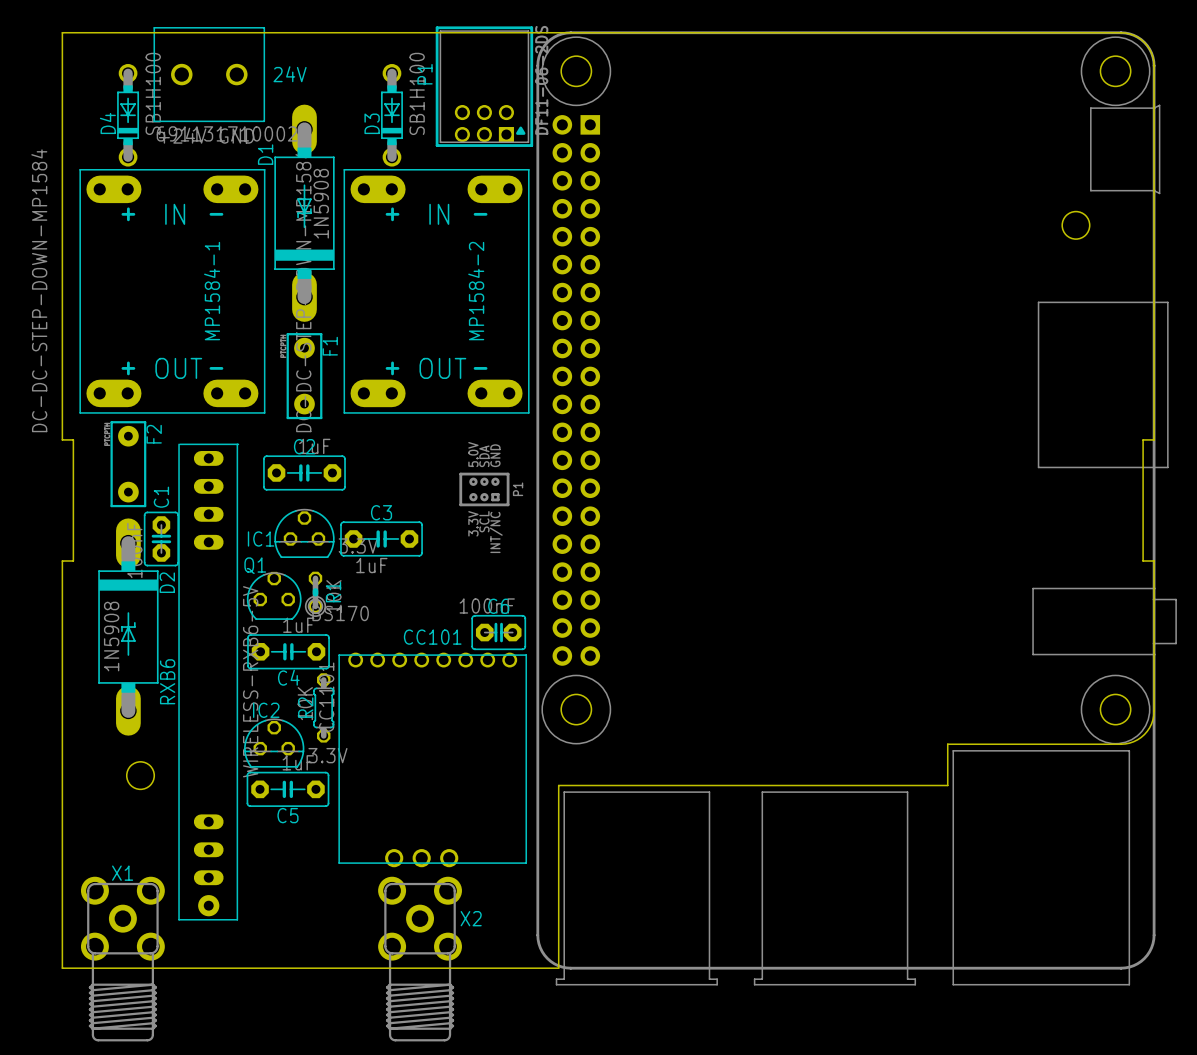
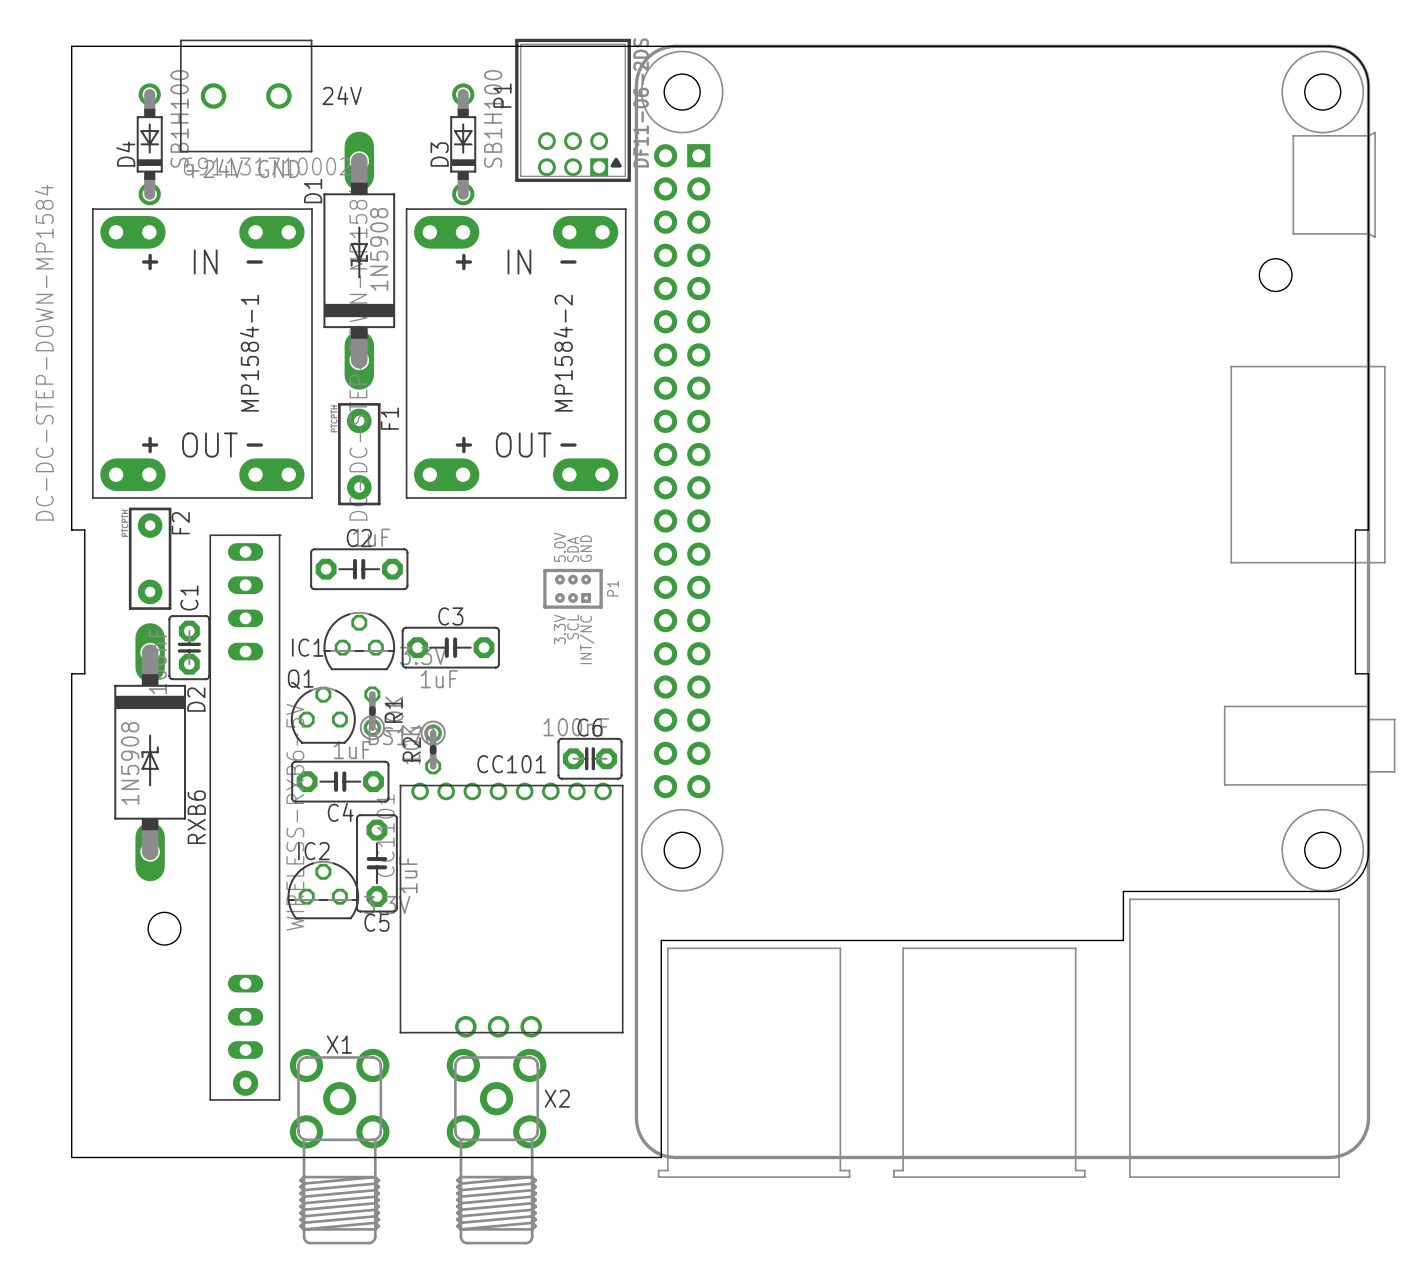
R2 footprint: [313, 673, 335, 743] -> [420, 720, 446, 775]
C5 rotation: 0° (287, 789) -> 90° clockwise (376, 863)
C5 position: (287, 789) -> (376, 863)
C5 name position: C5 (287, 815) -> C5 (376, 922)
X1 position: (122, 959) -> (339, 1146)

